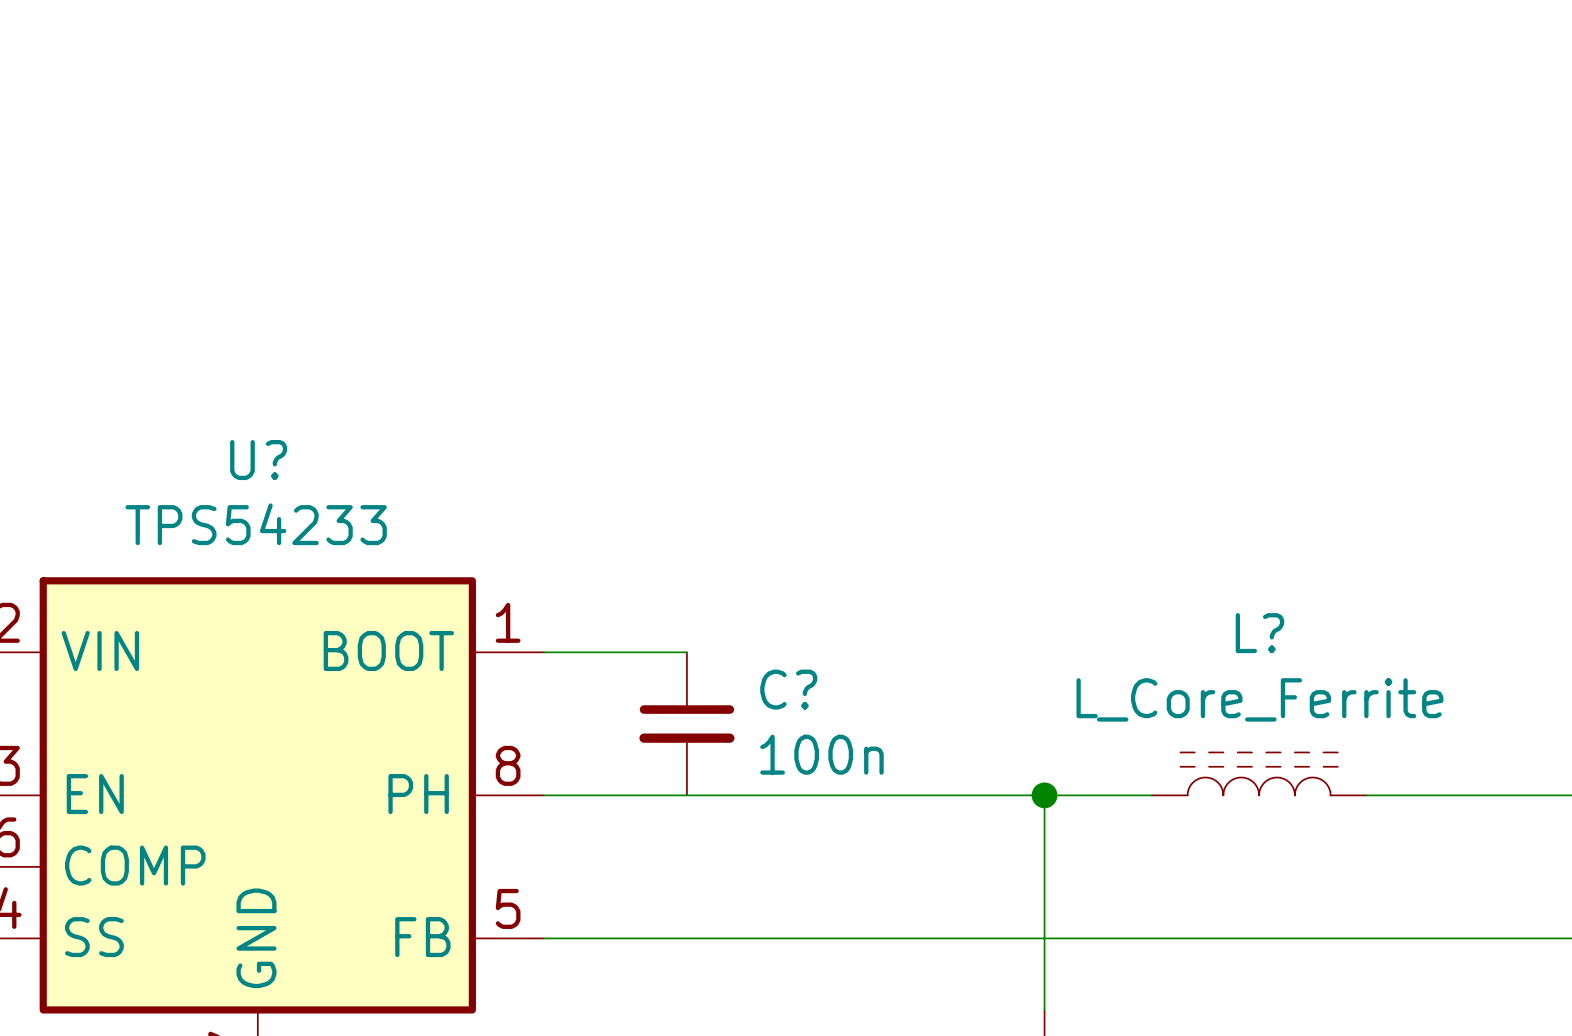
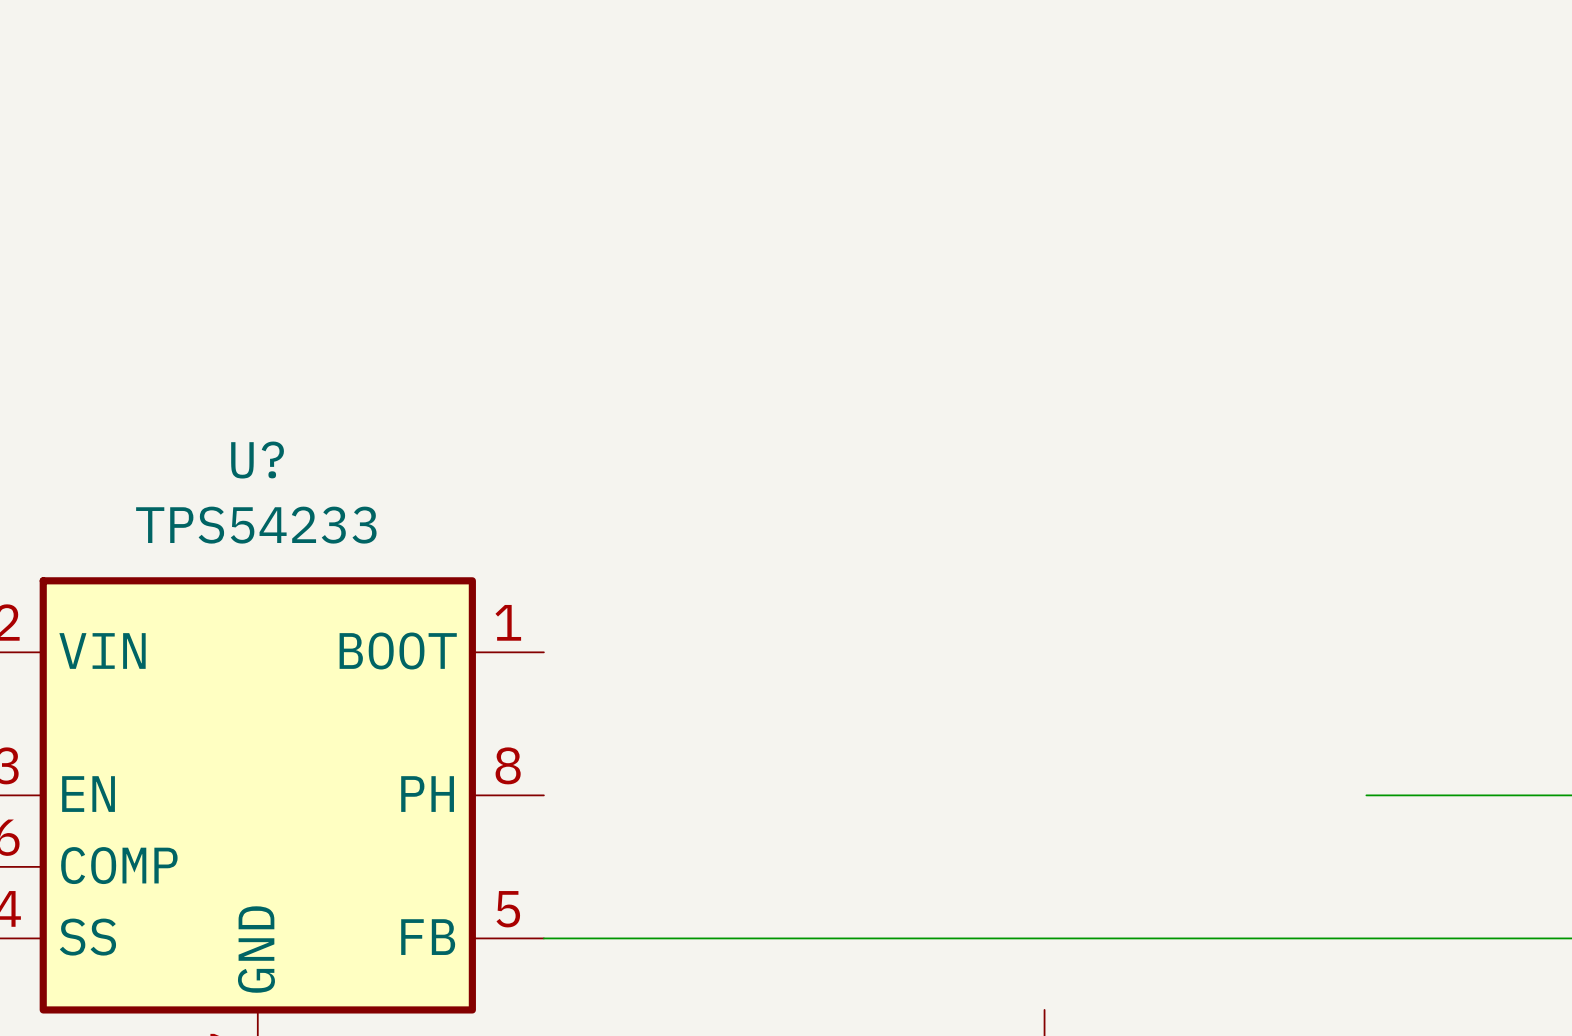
wire: (543, 652) (686, 652) -> none
C?: 100n (686, 723) -> none
L?: L_Core_Ferrite (1259, 773) -> none
wire: (543, 795) (1151, 795) -> none
wire: (1044, 795) (1044, 1009) -> none
junction: (1044, 795) -> none

